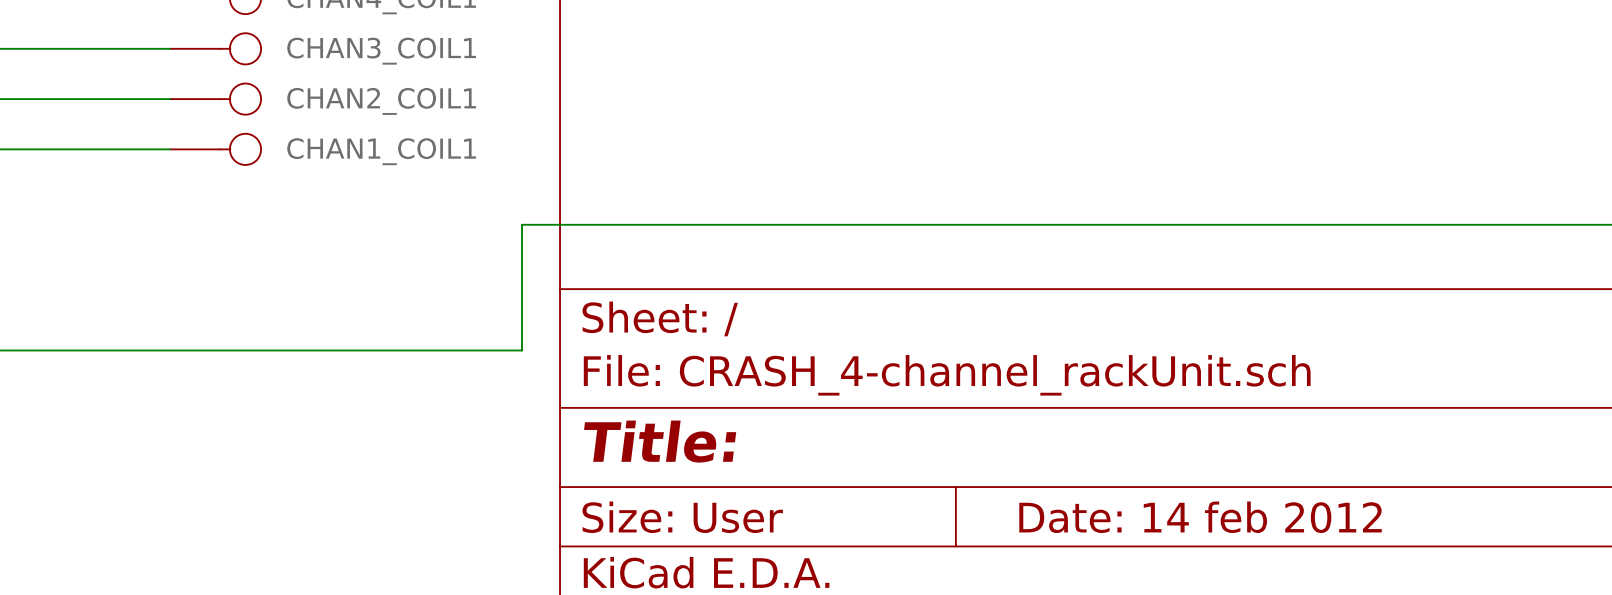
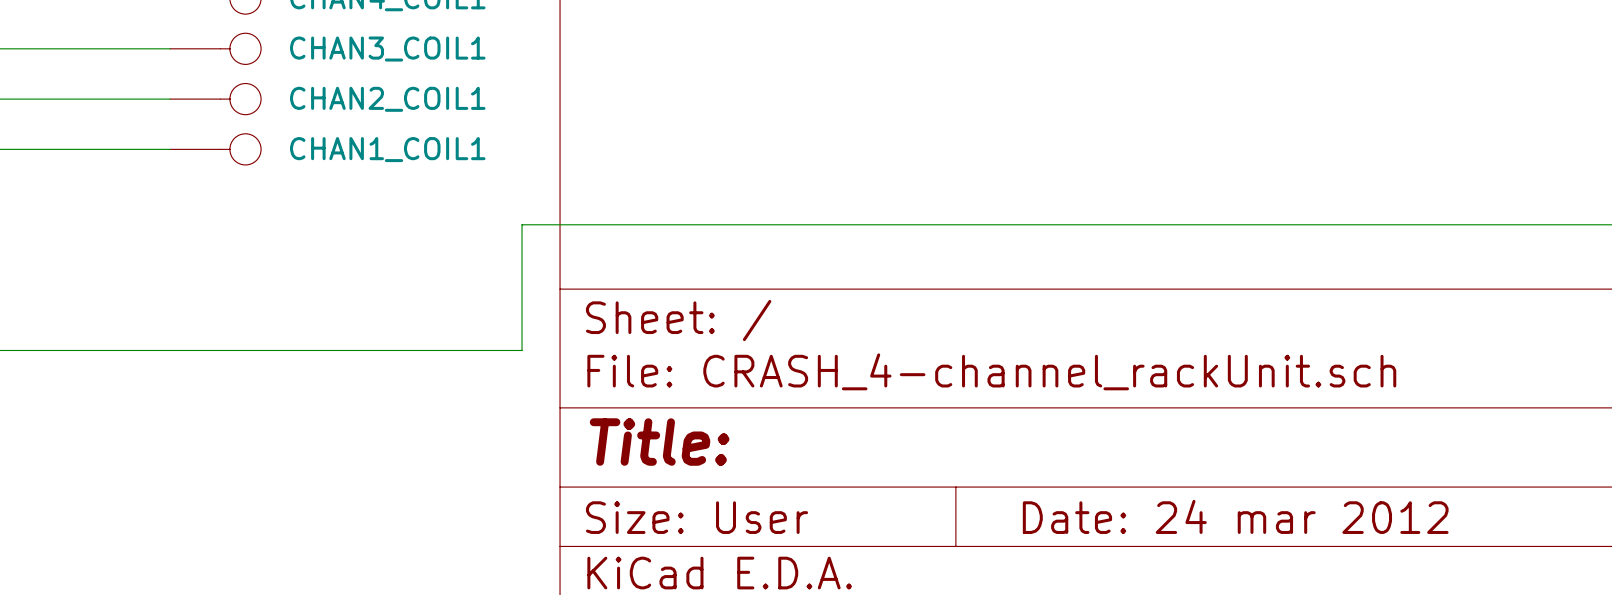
title block: Date: 14 feb 2012 (1200, 517) -> Date: 24 mar 2012 (1235, 516)

